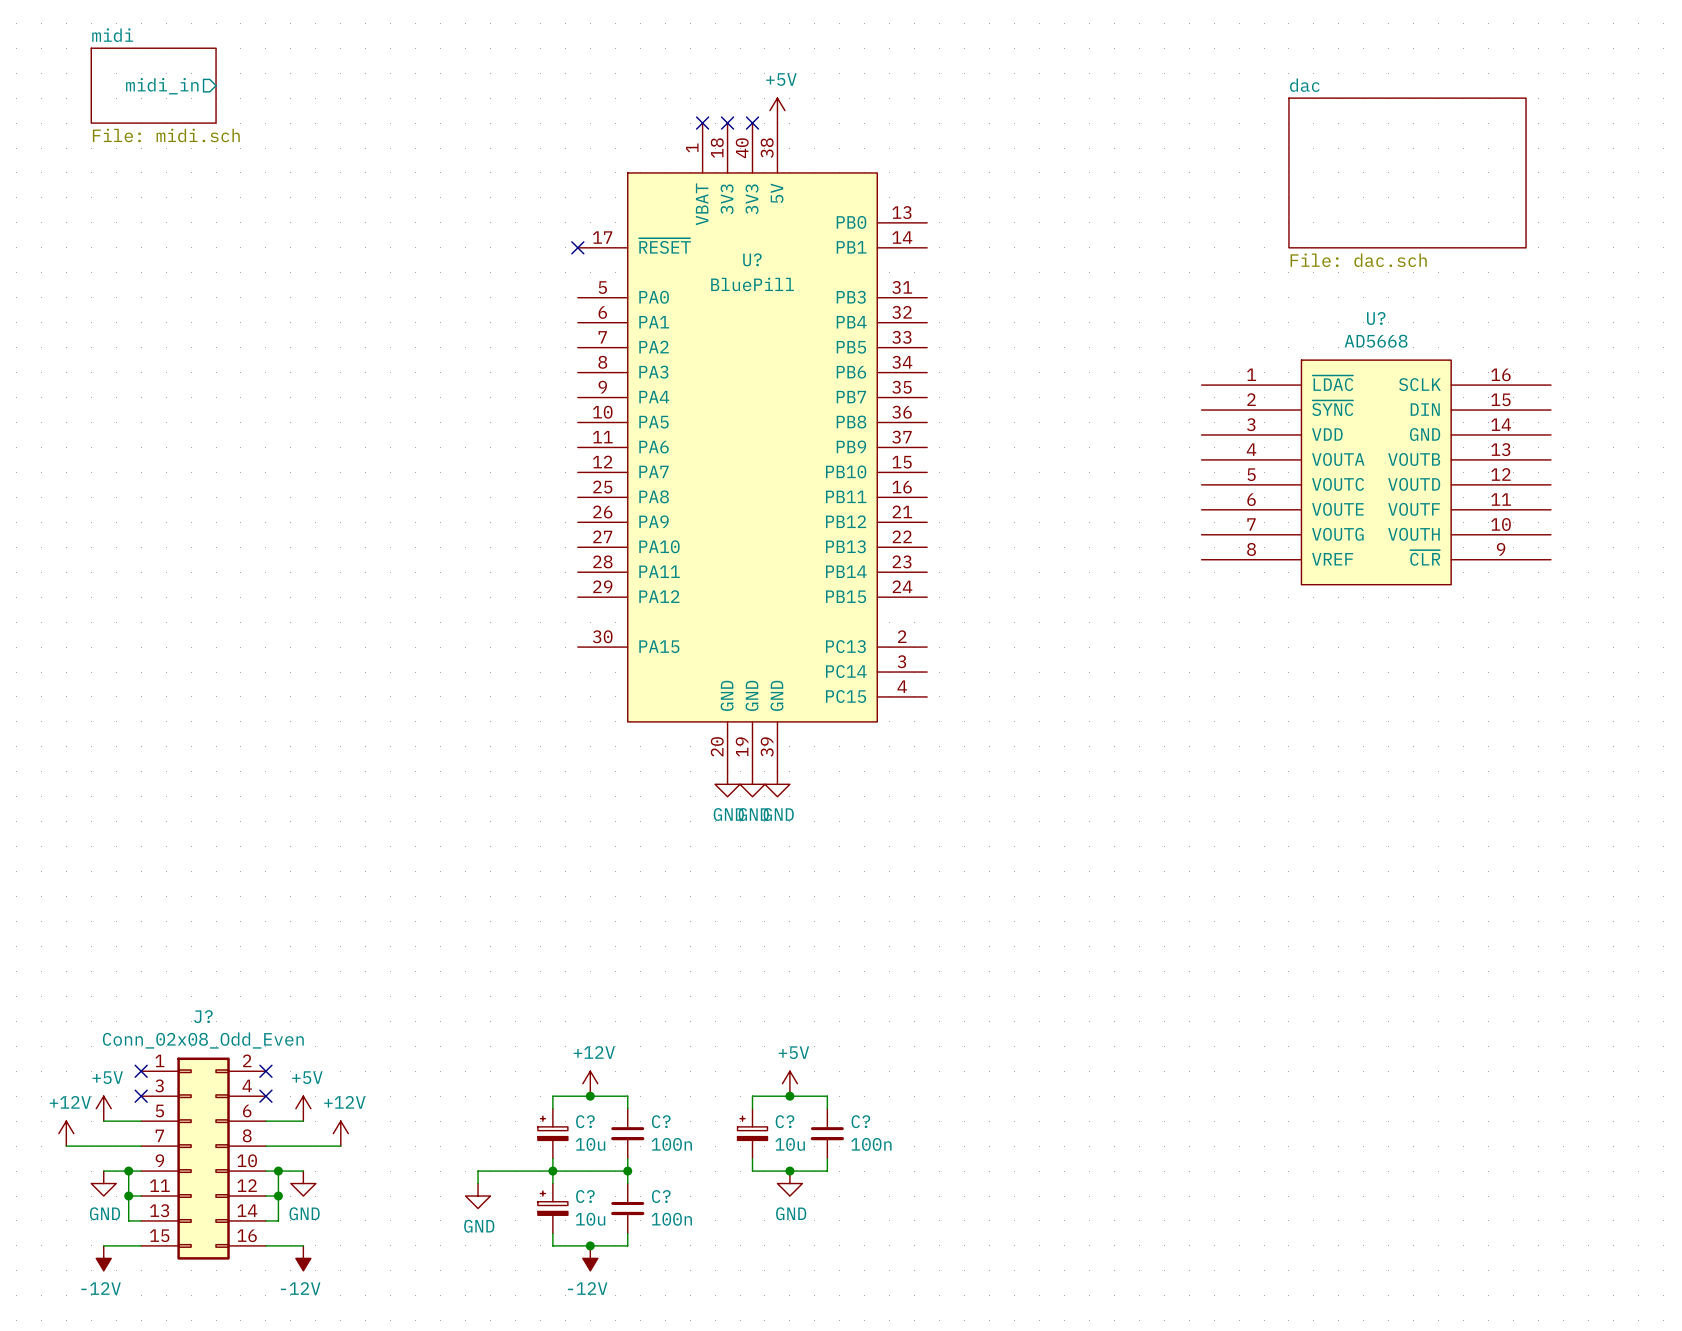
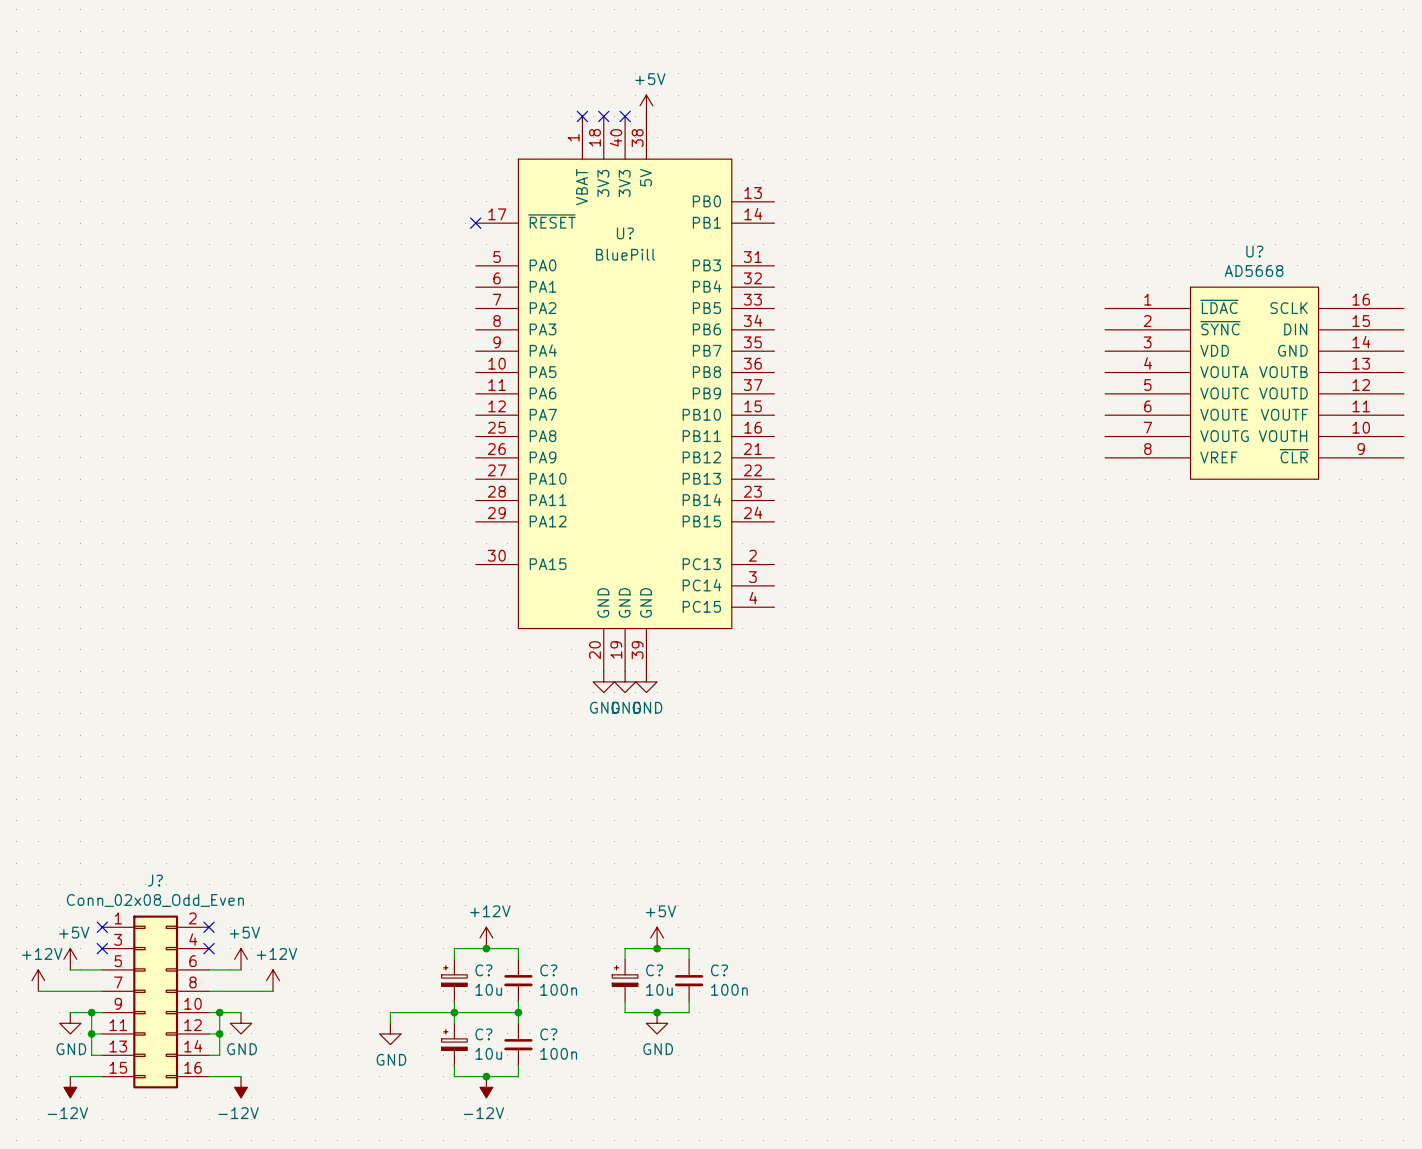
sheet midi: File: midi.sch (153, 85) -> none
sheet pin: midi_in (162, 86) -> none
sheet dac: File: dac.sch (1407, 172) -> none
U? position: (1376, 472) -> (1254, 383)

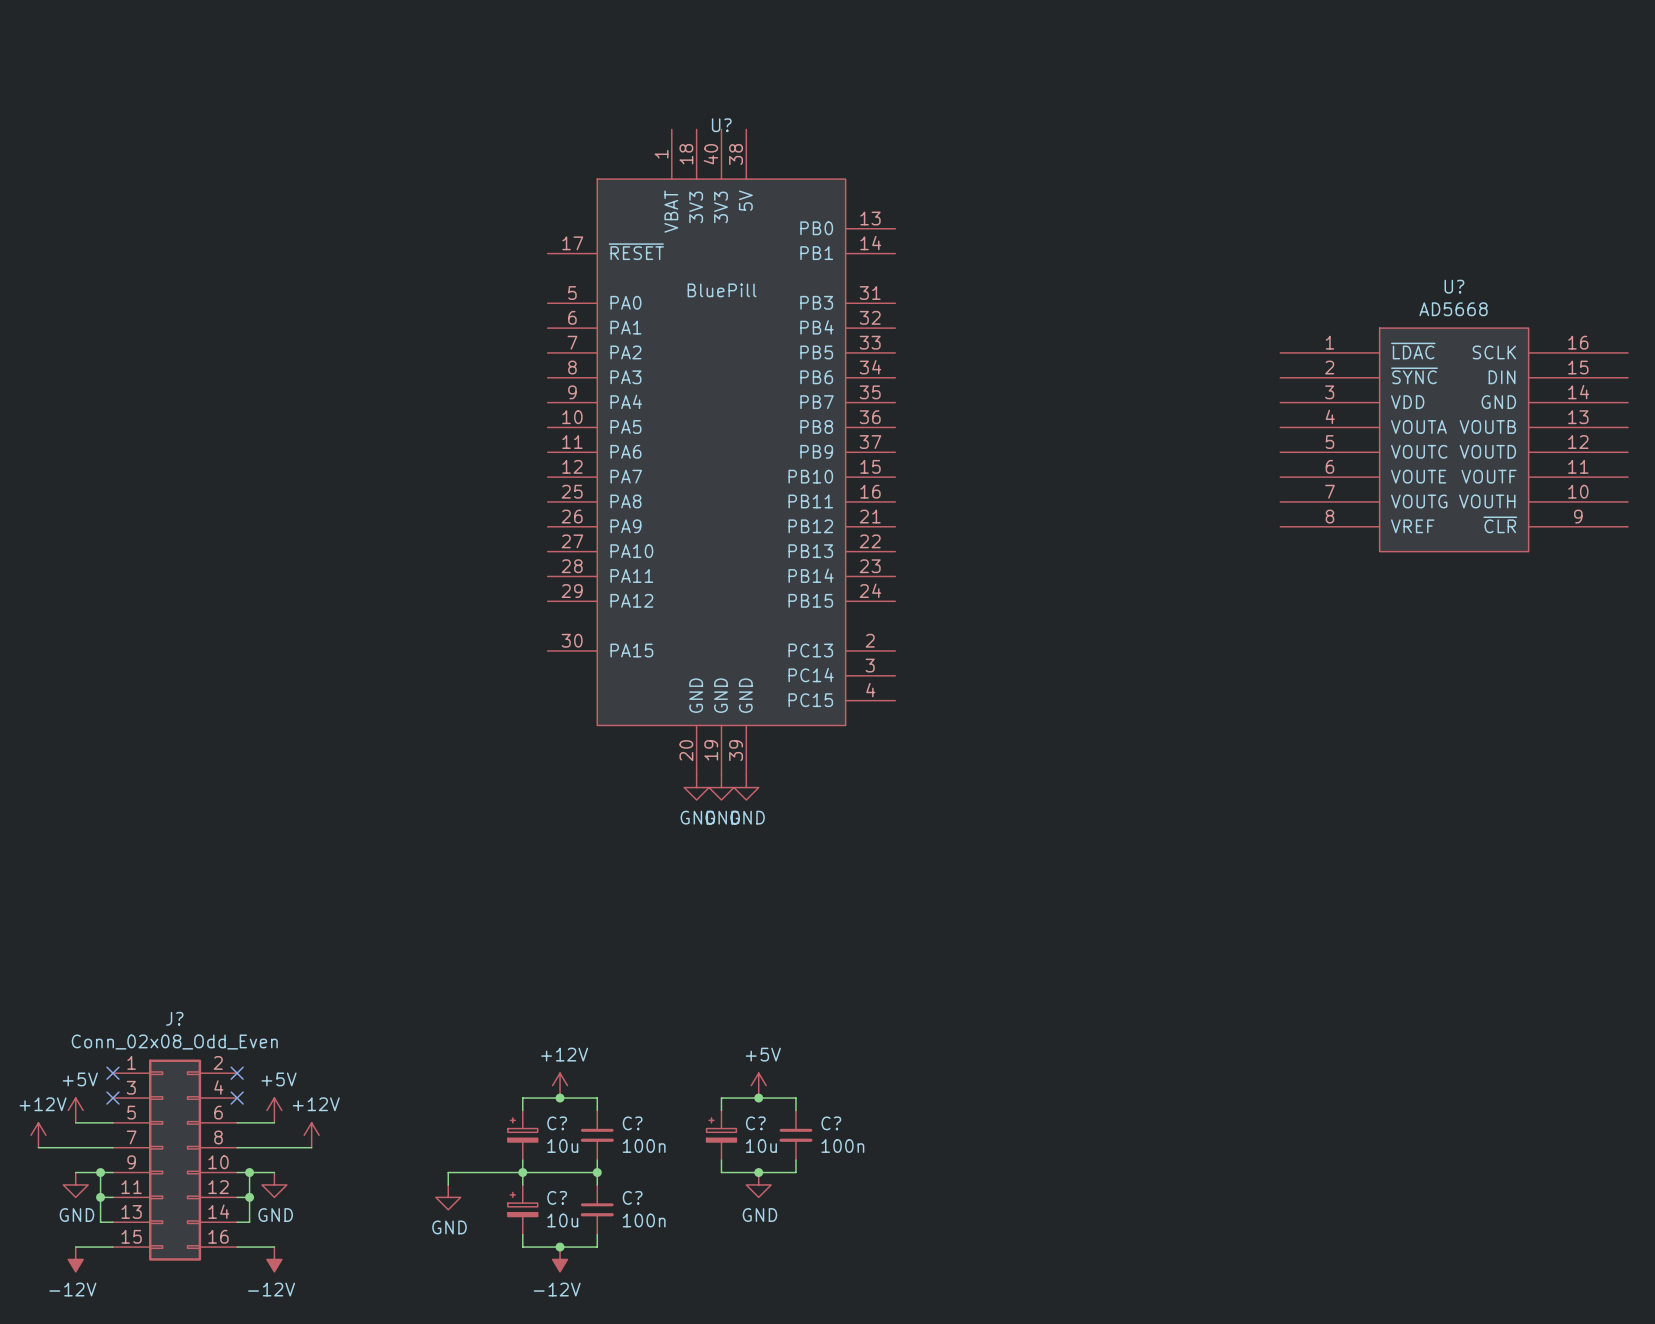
power symbol: +5V (646, 105) -> none
no-connect mark: (582, 116) -> none
no-connect mark: (603, 116) -> none
no-connect mark: (625, 116) -> none
no-connect mark: (475, 223) -> none
U? name position: U? (625, 233) -> U? (721, 125)

